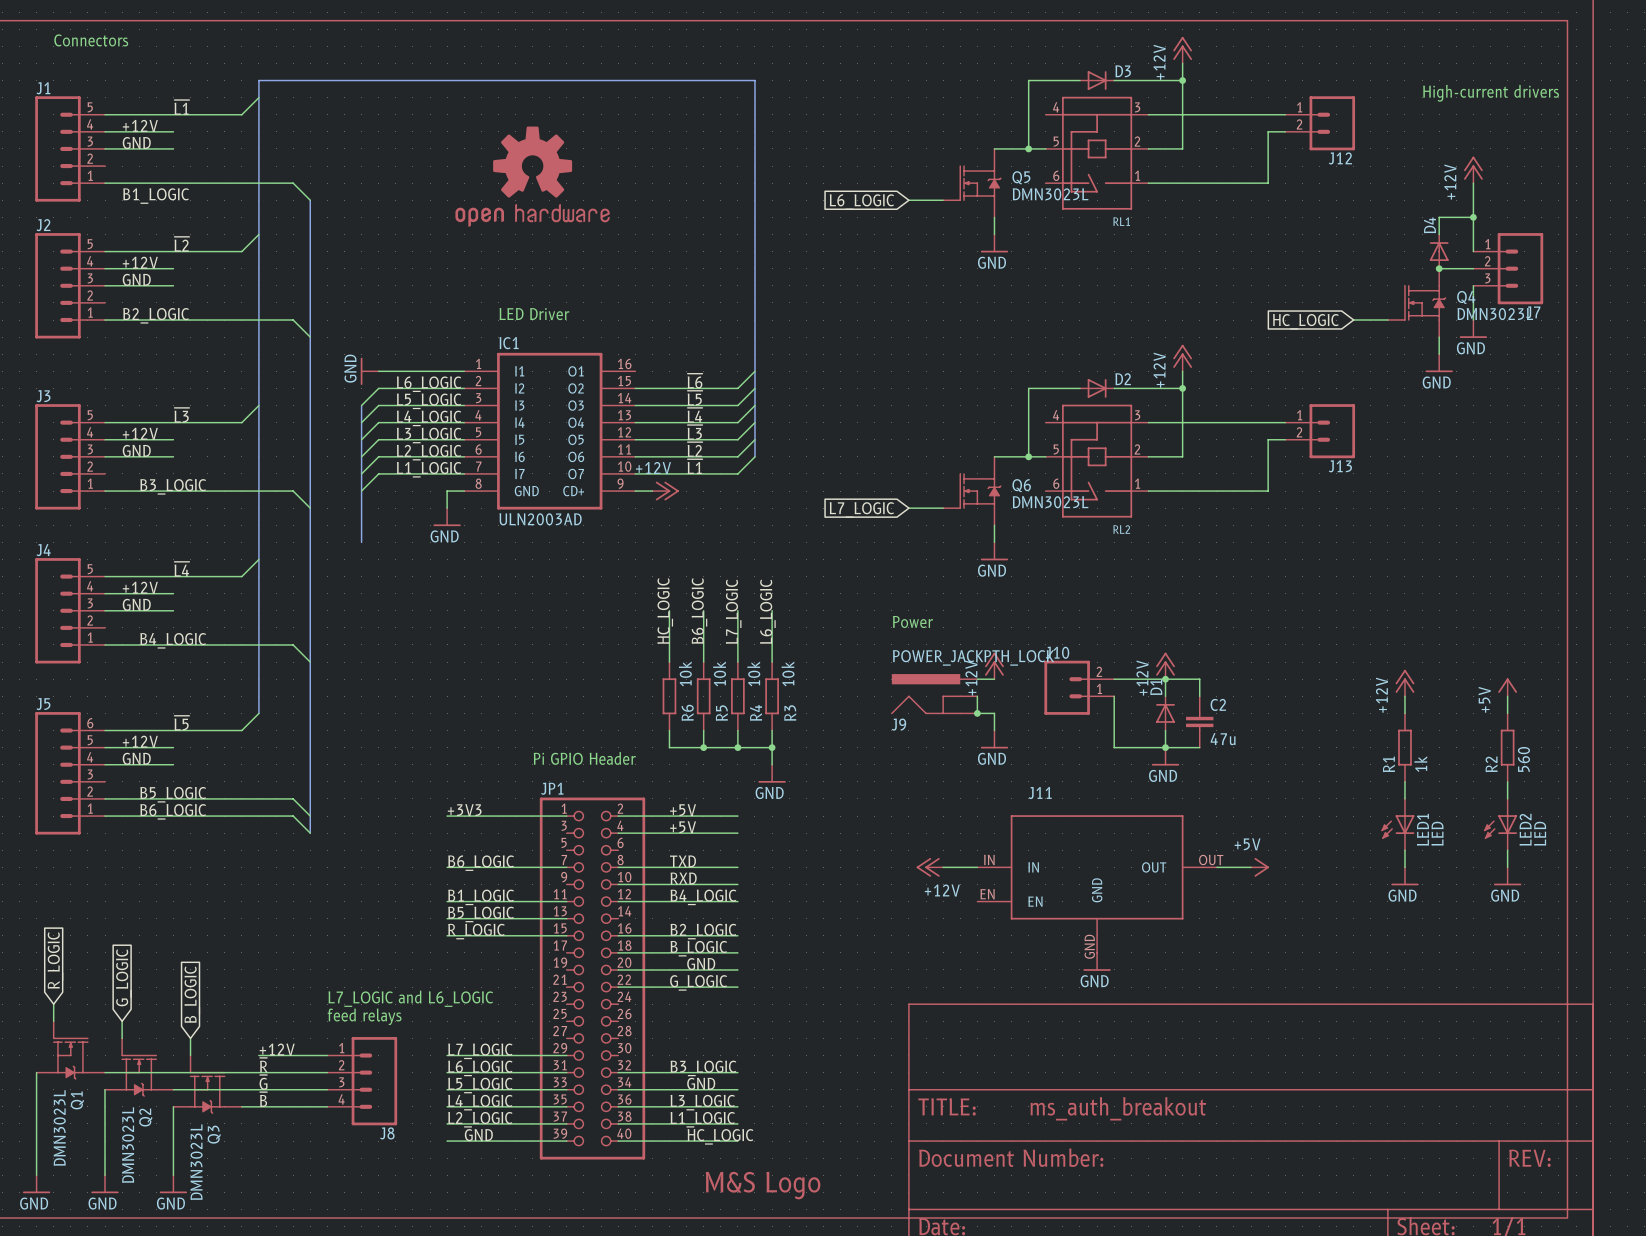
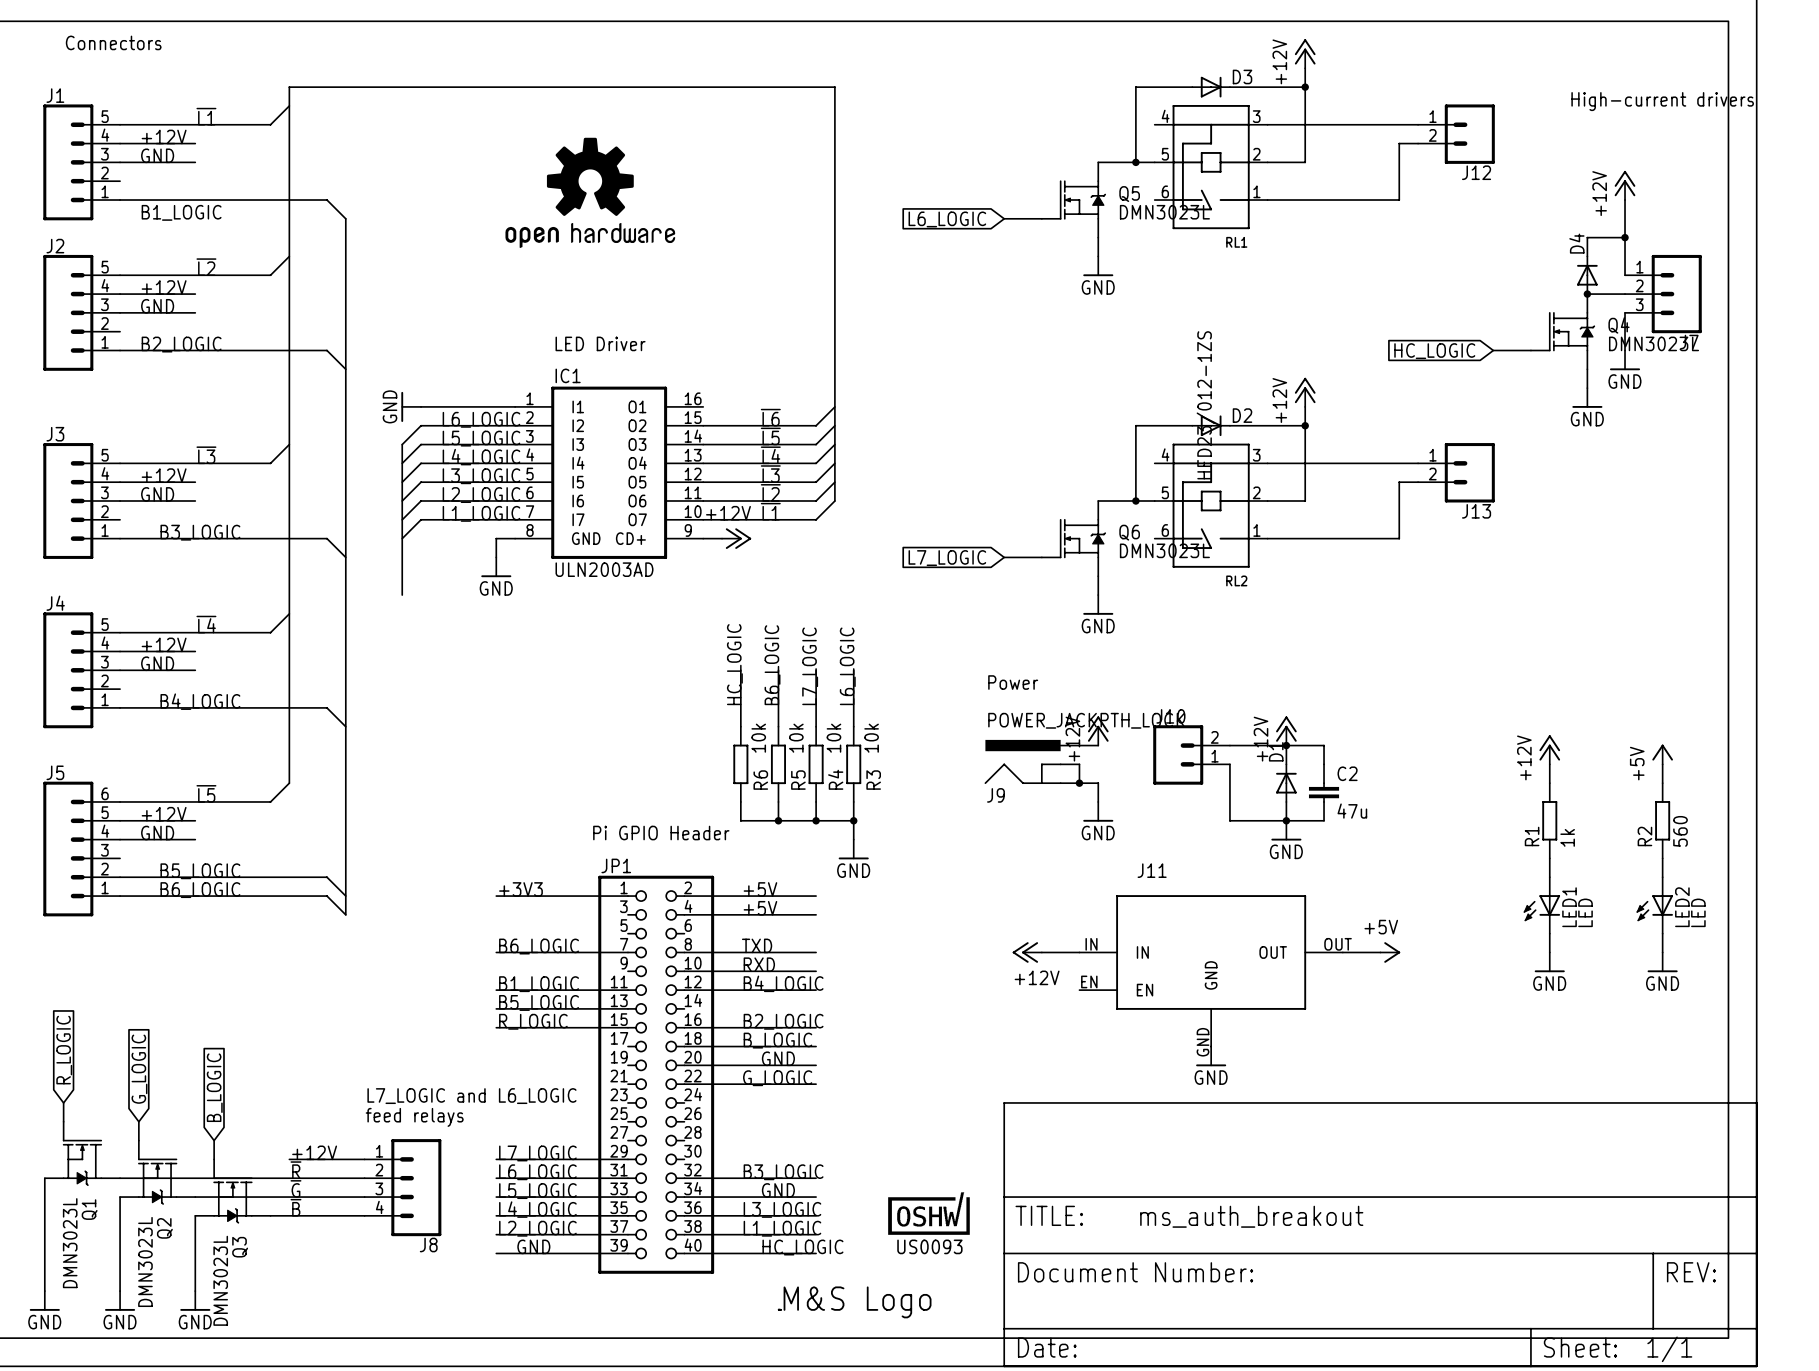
RL2 text: none -> HFD23/012-1ZS (1205, 405)
part: none -> US0093 (928, 1213)

